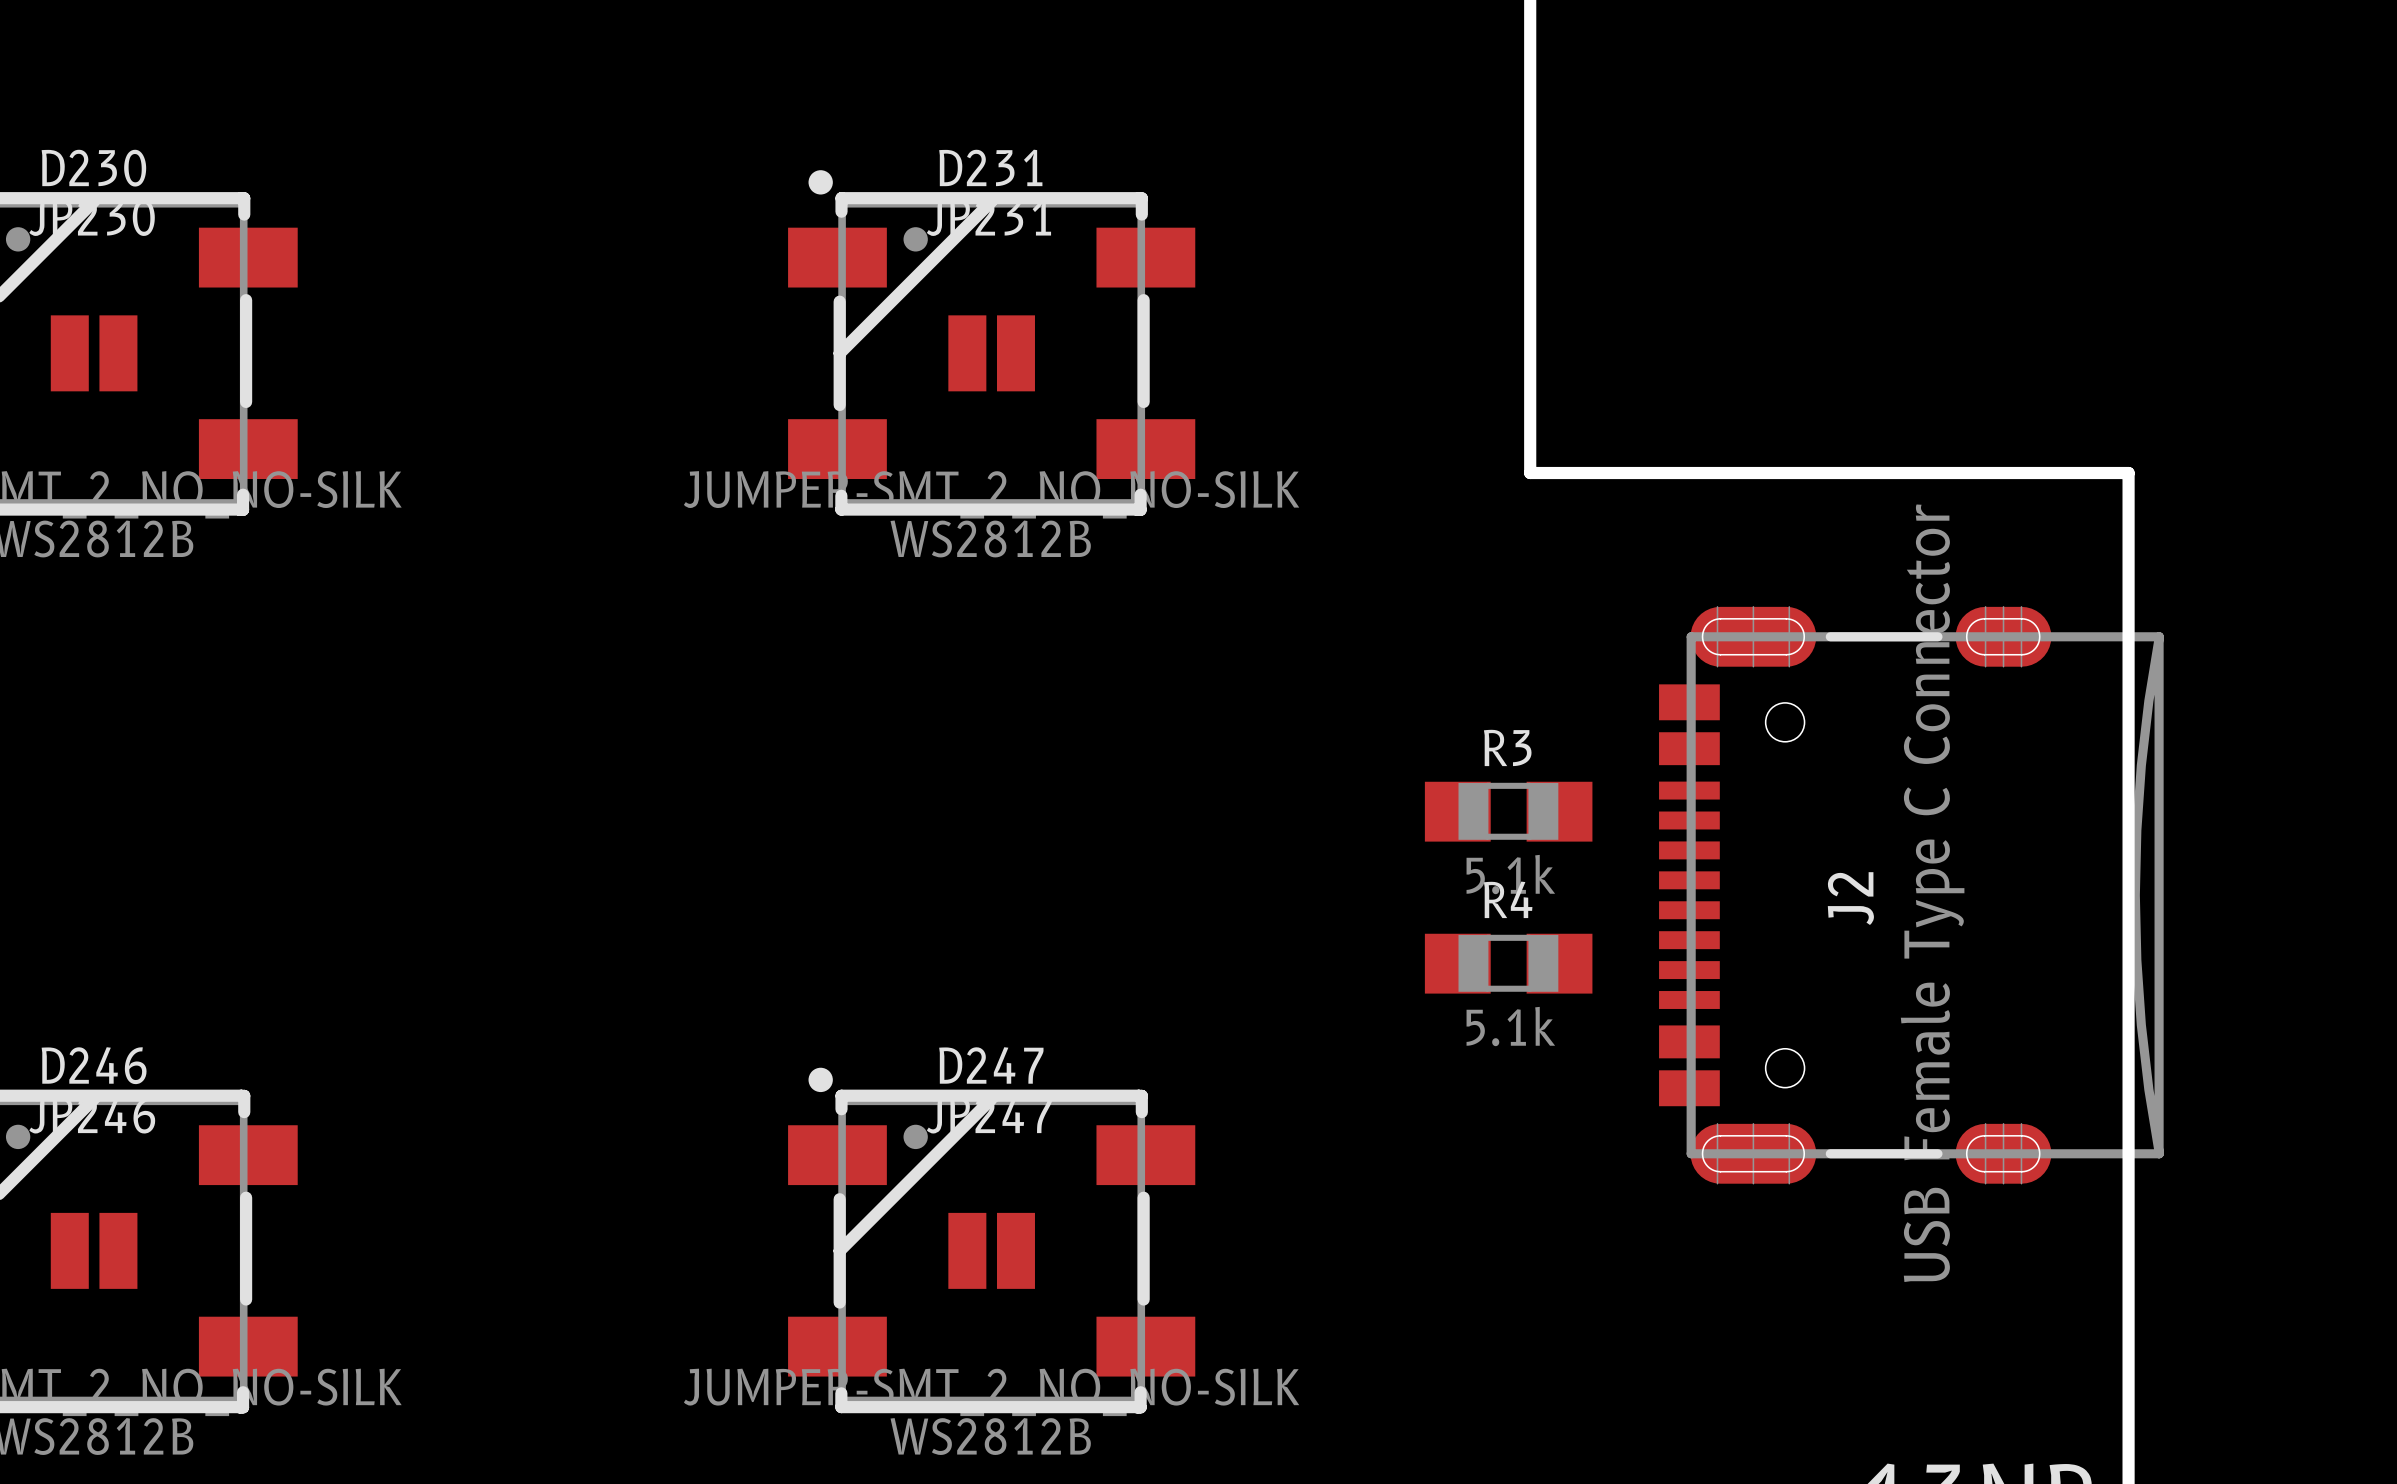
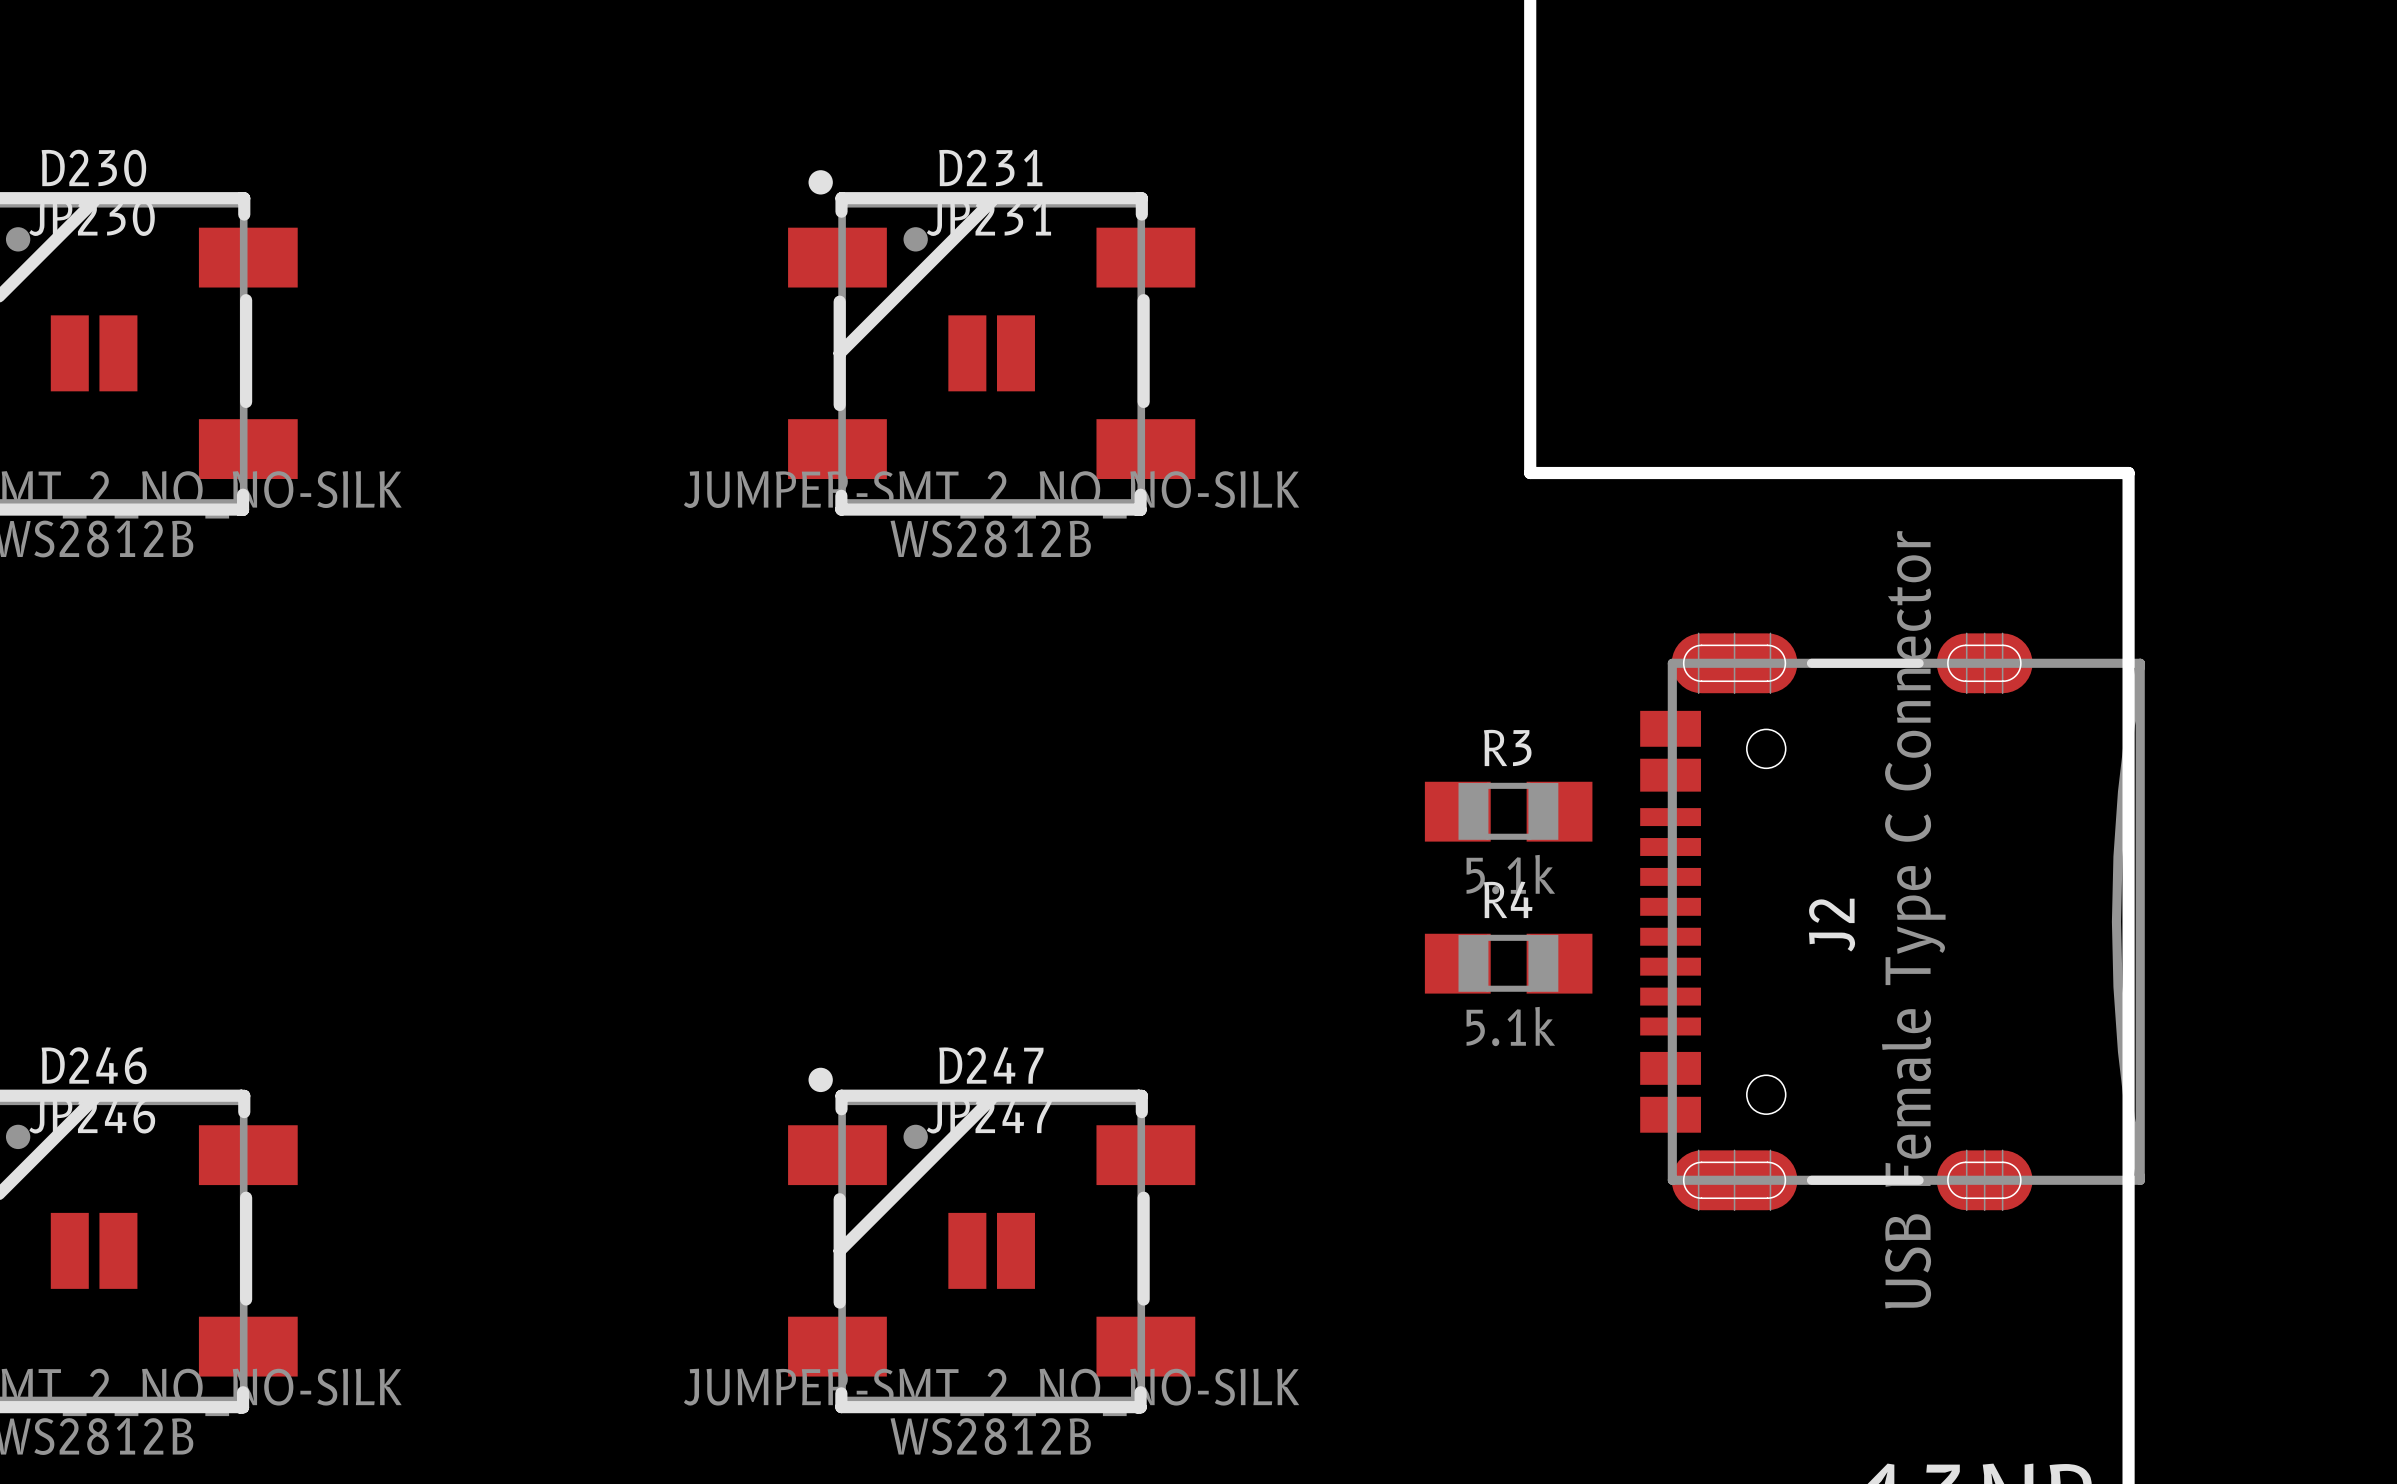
J2 position: (1911, 895) -> (1892, 921)

